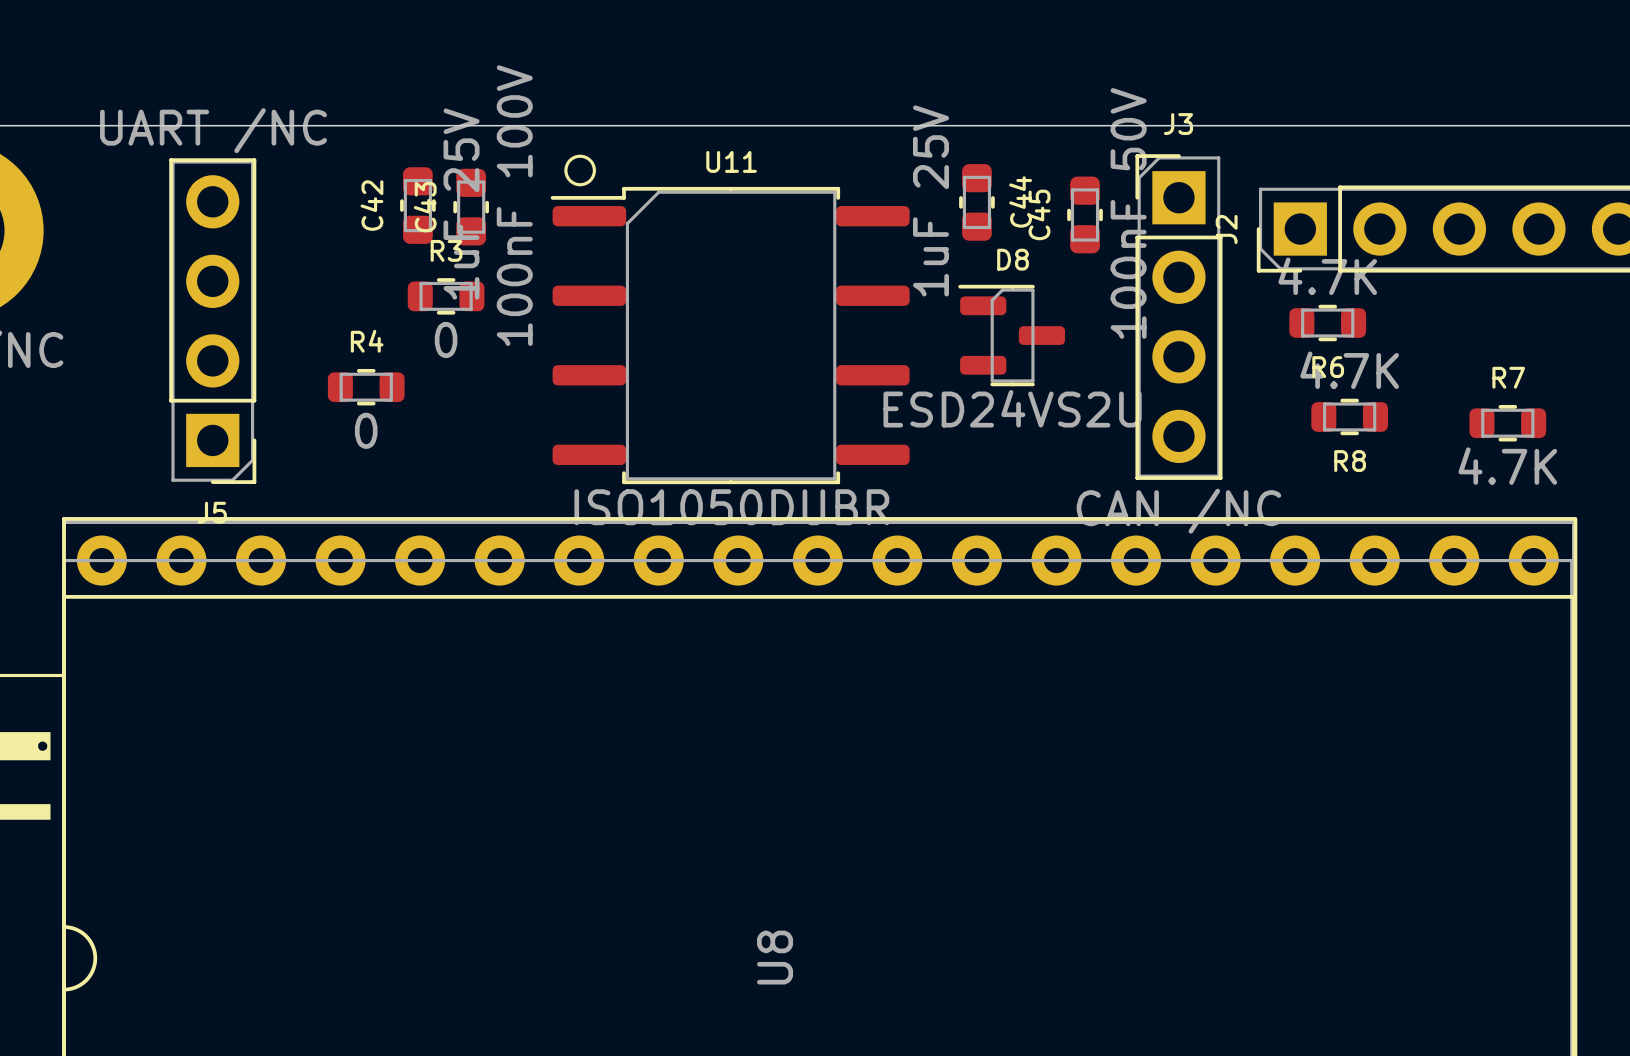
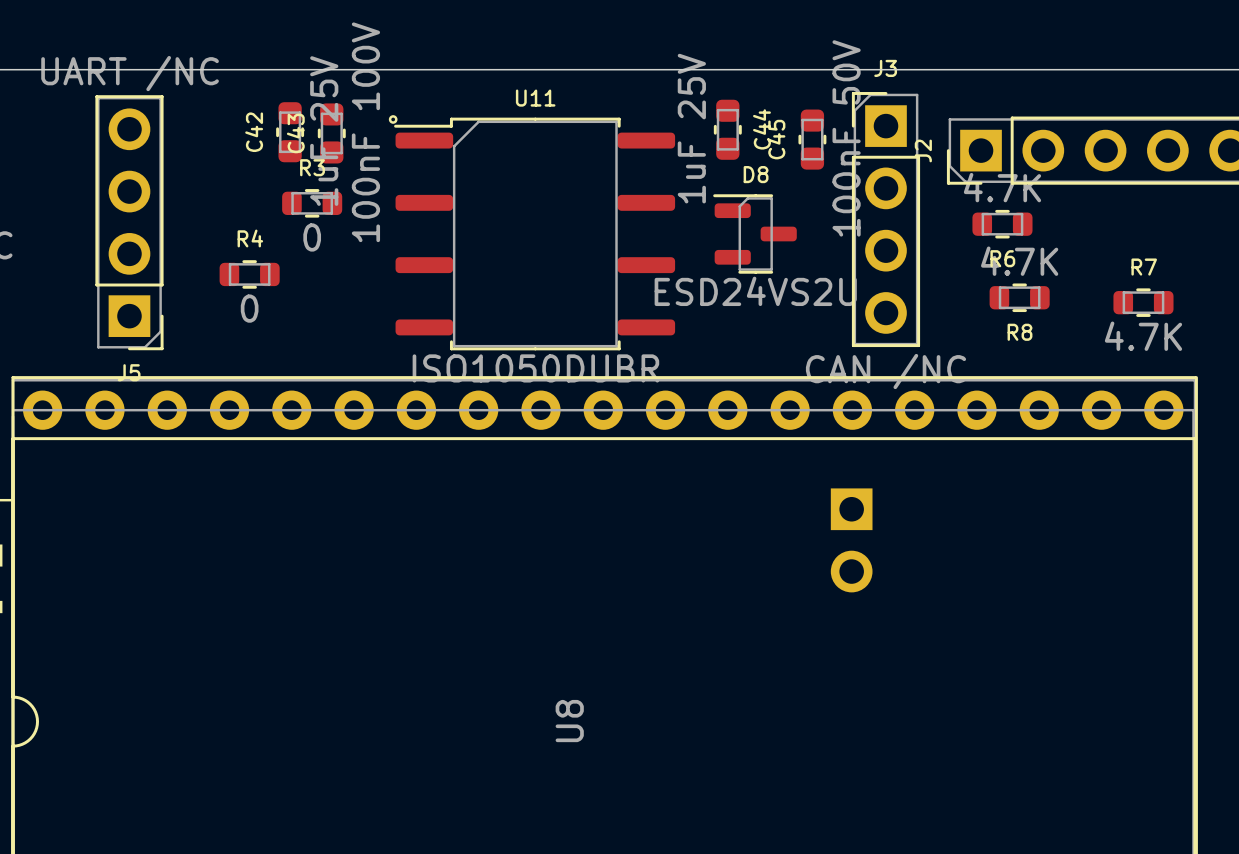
U11 footprint: [550, 154, 910, 485] -> [388, 115, 676, 351]
part: none -> (851, 540)

